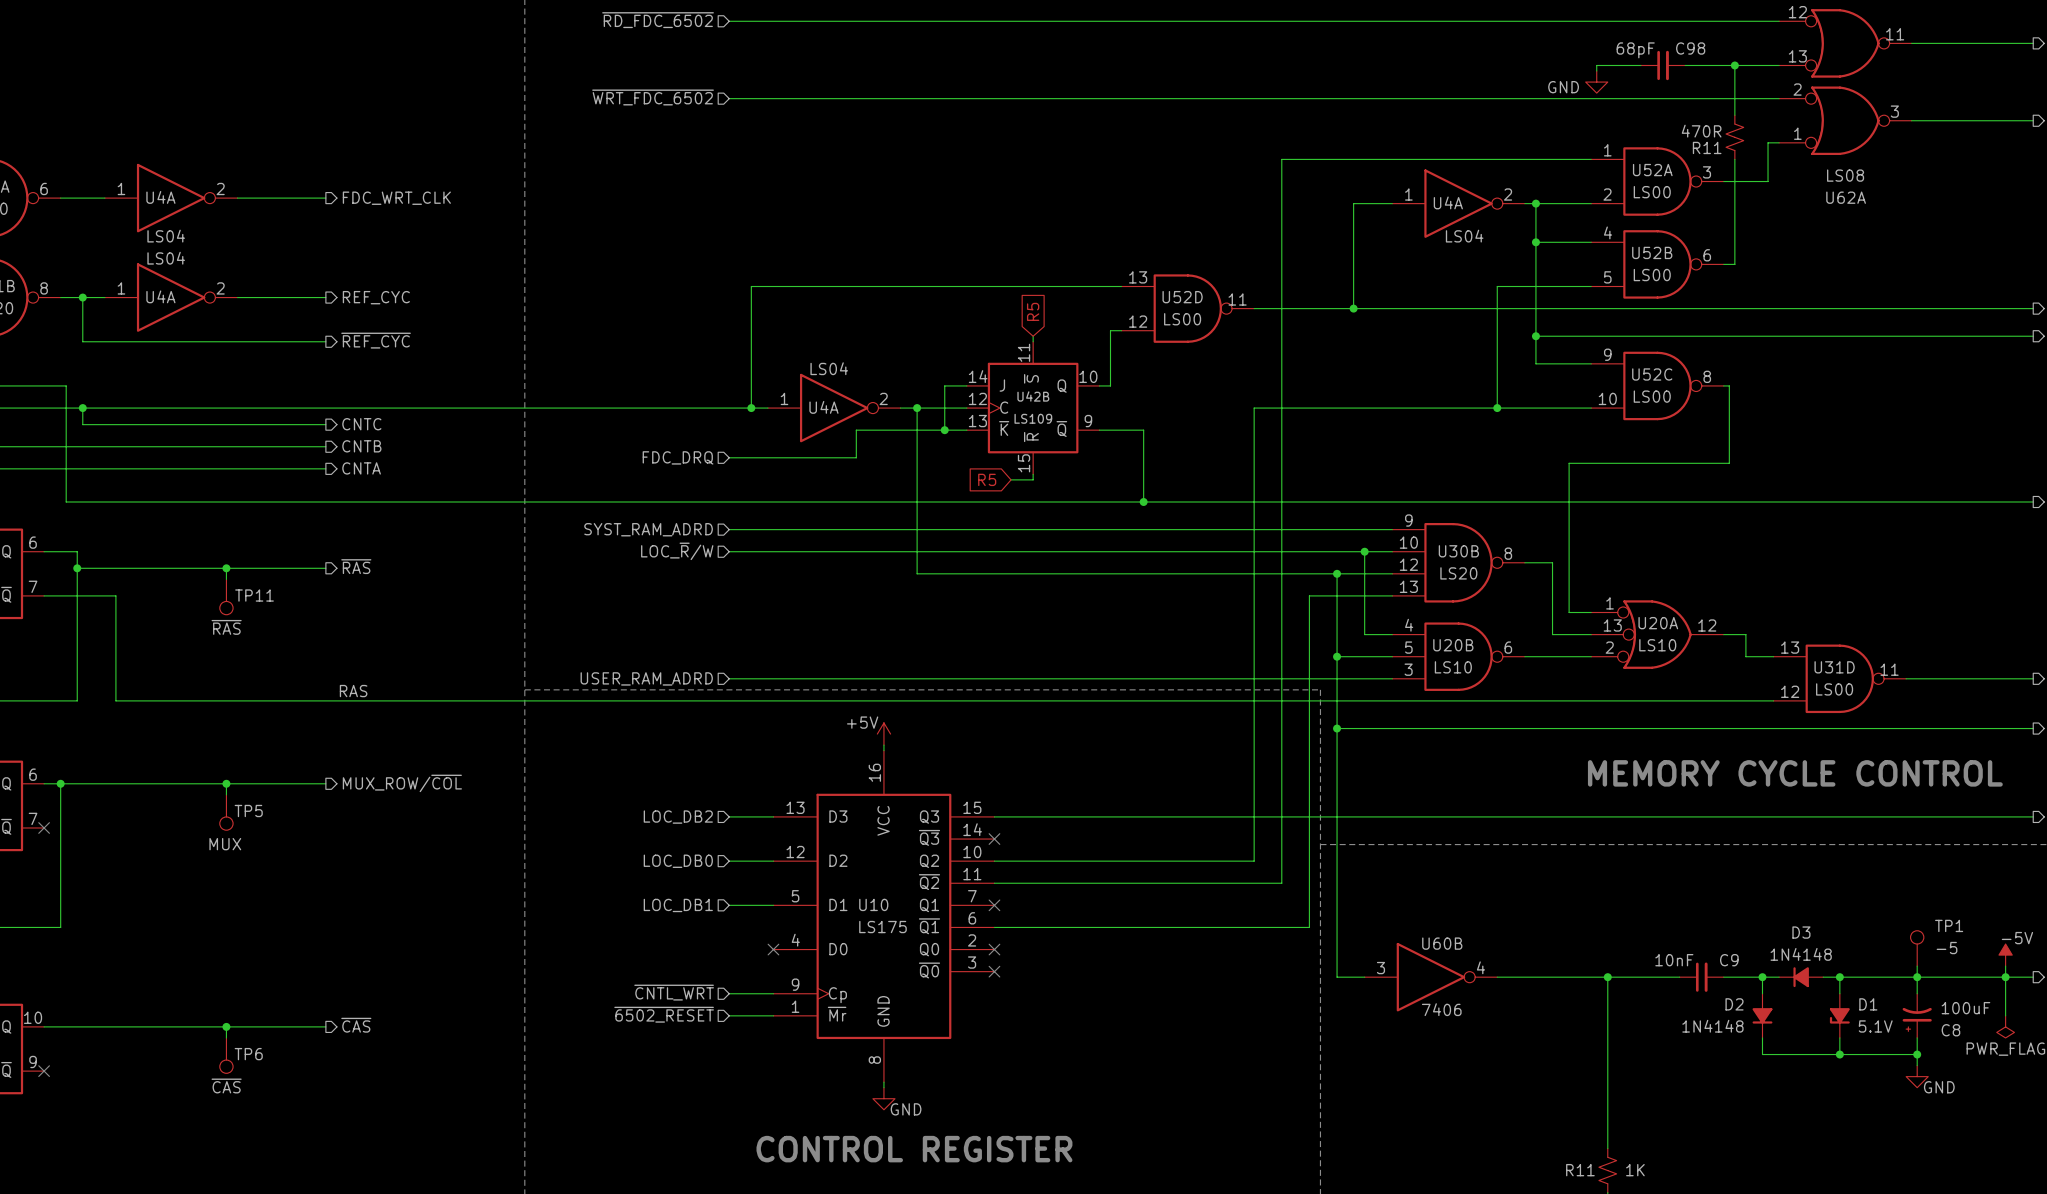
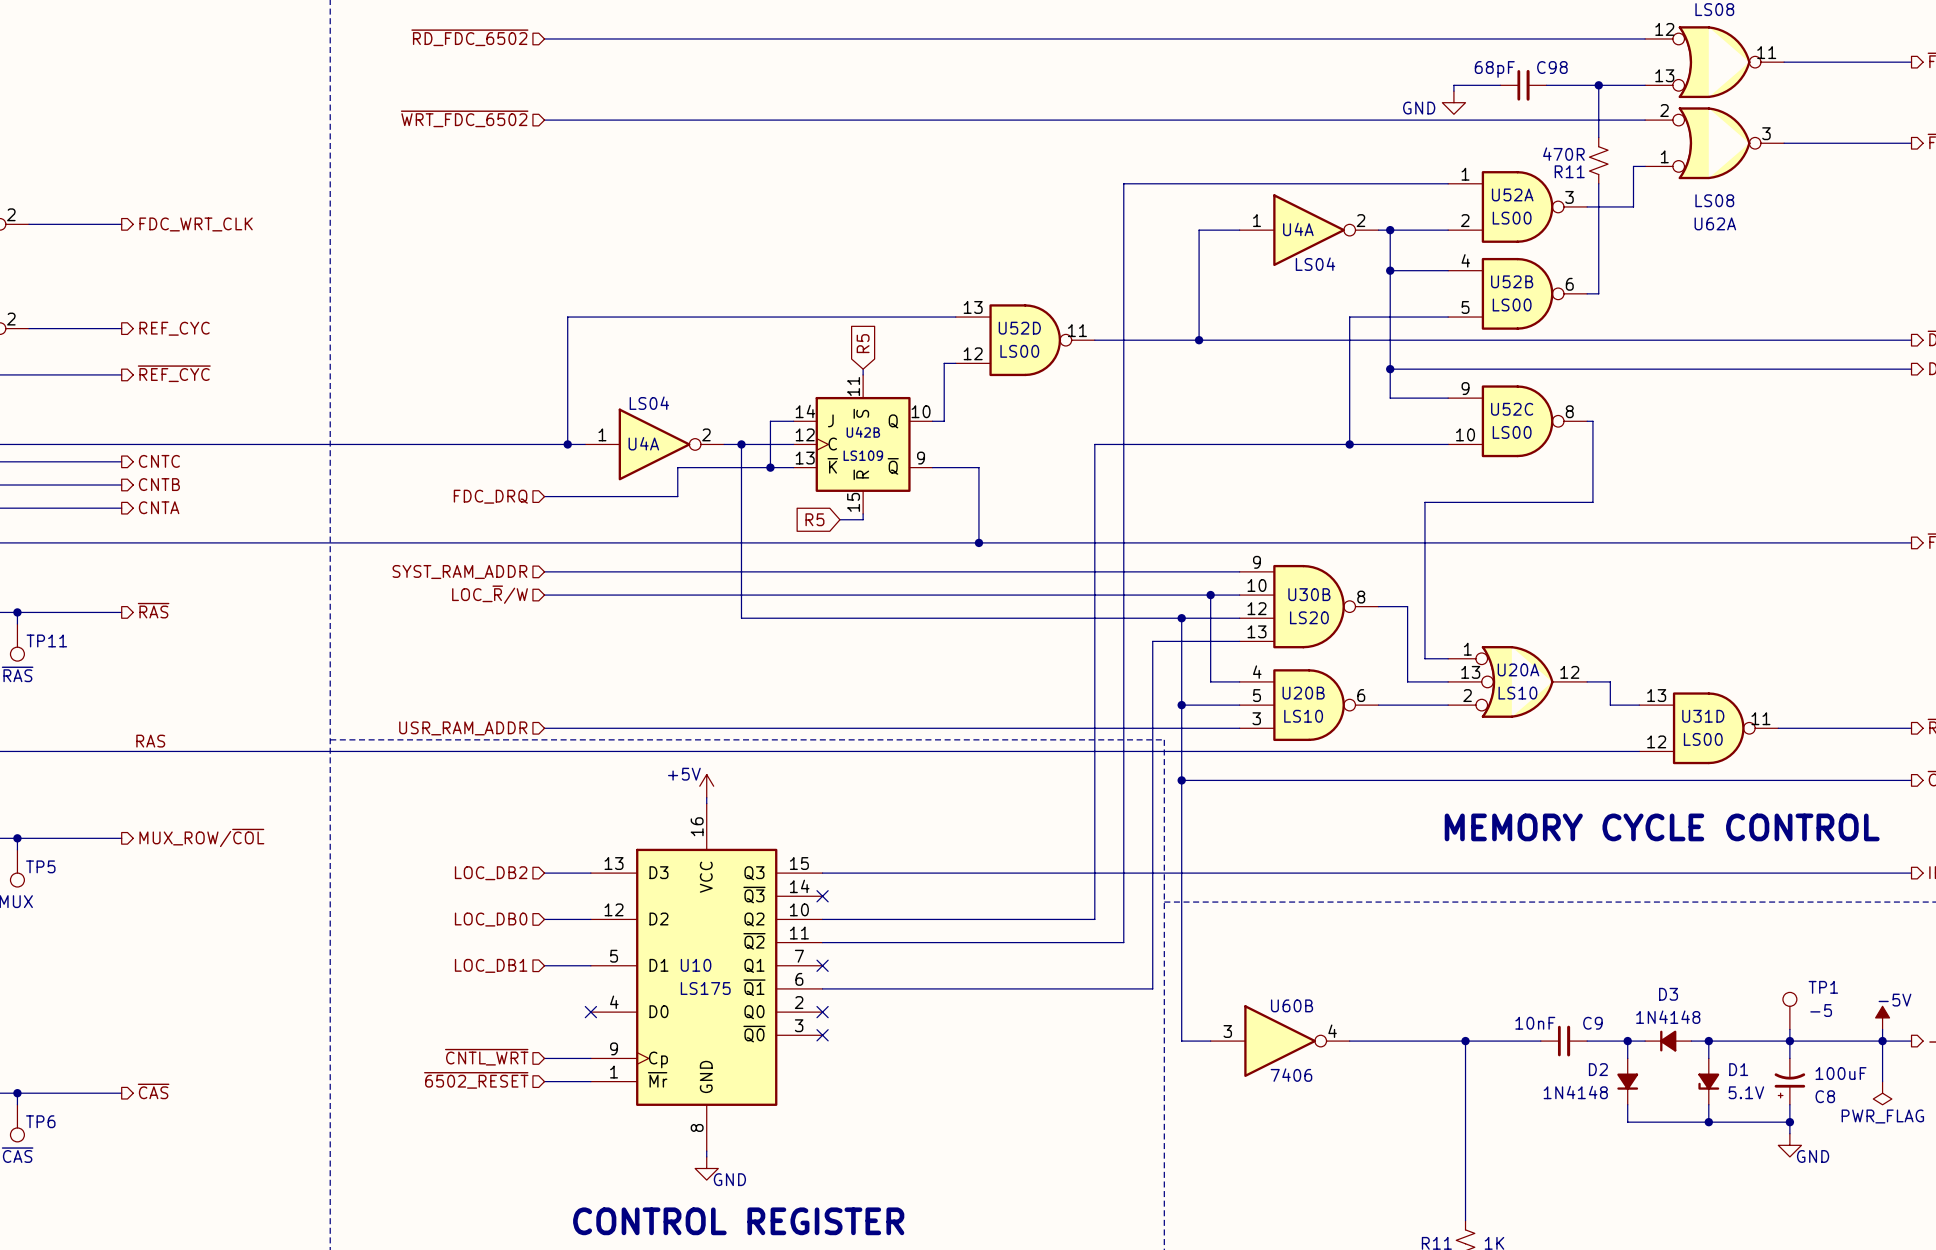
hierarchical label: SYST_RAM_ADRD (648, 529) -> SYST_RAM_ADDR (459, 572)
hierarchical label: USER_RAM_ADRD (646, 678) -> USR_RAM_ADDR (463, 728)

